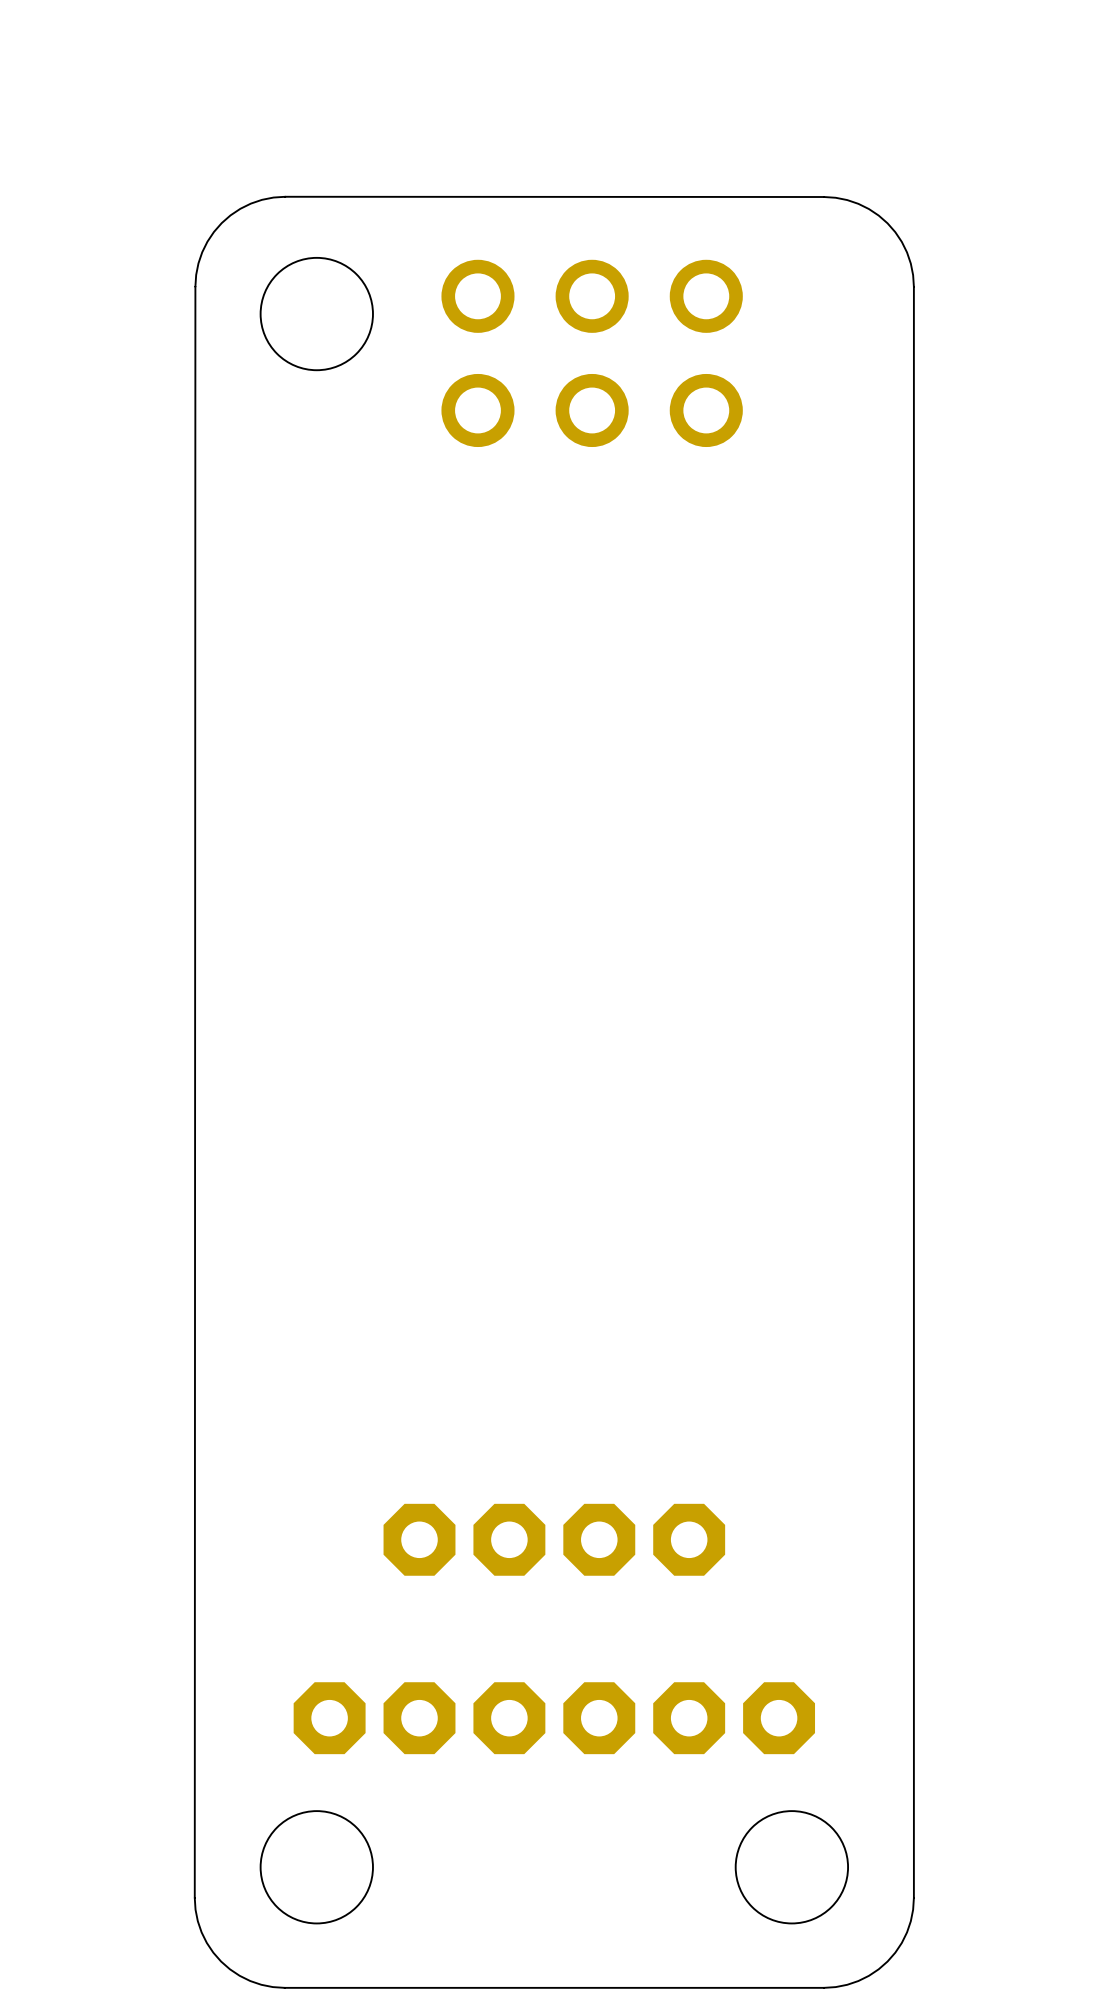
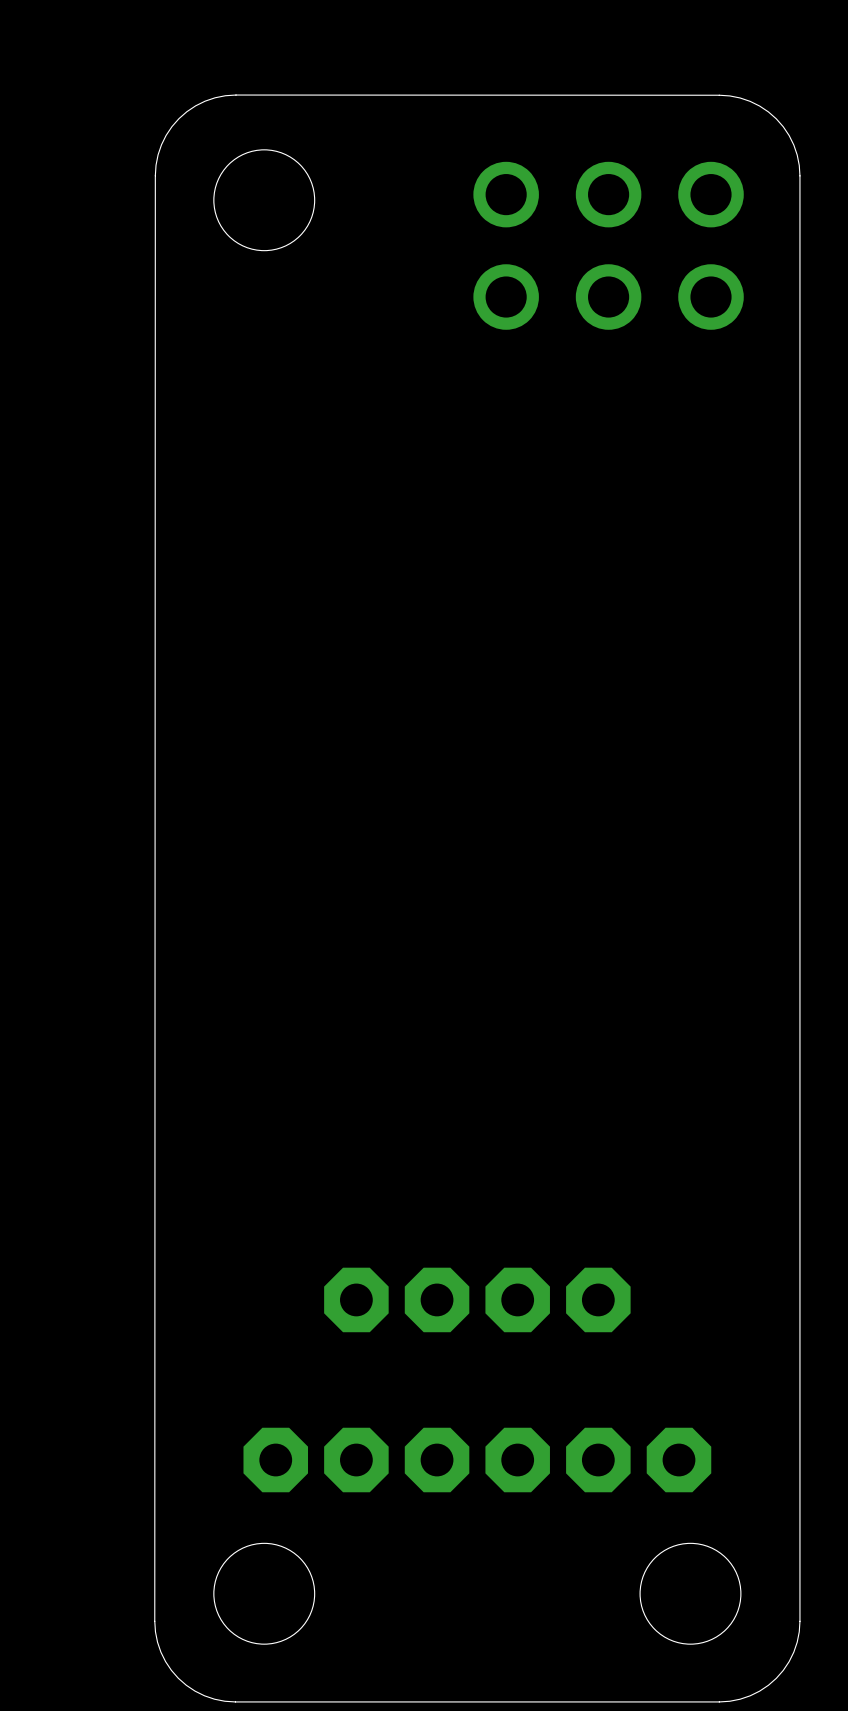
part position: (592, 353) -> (608, 245)

